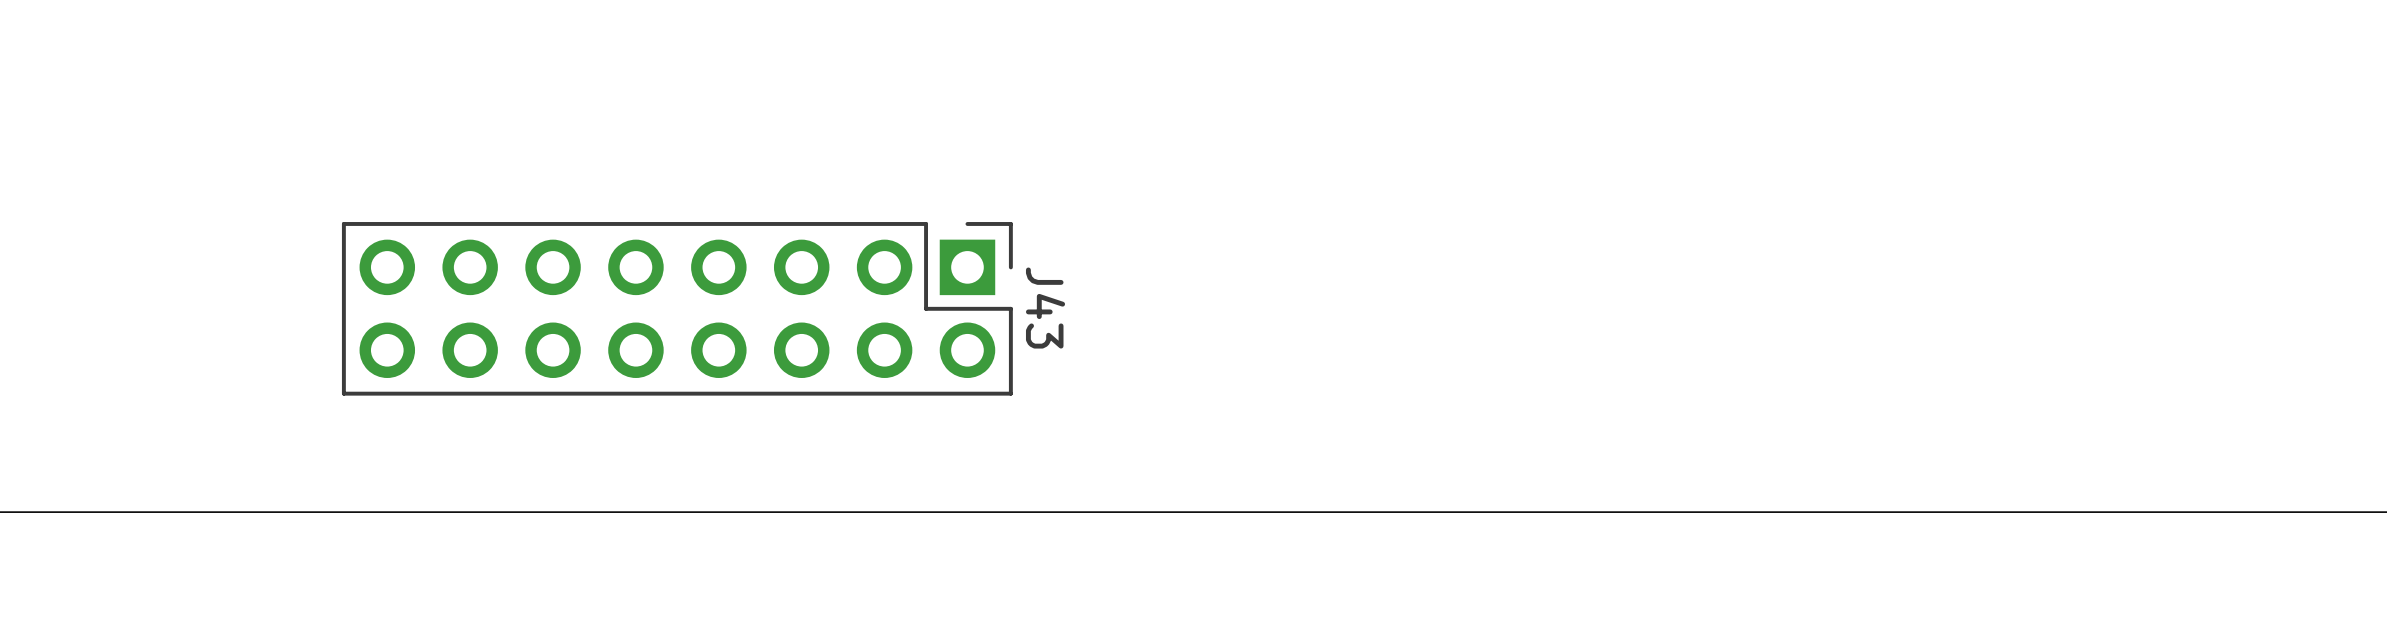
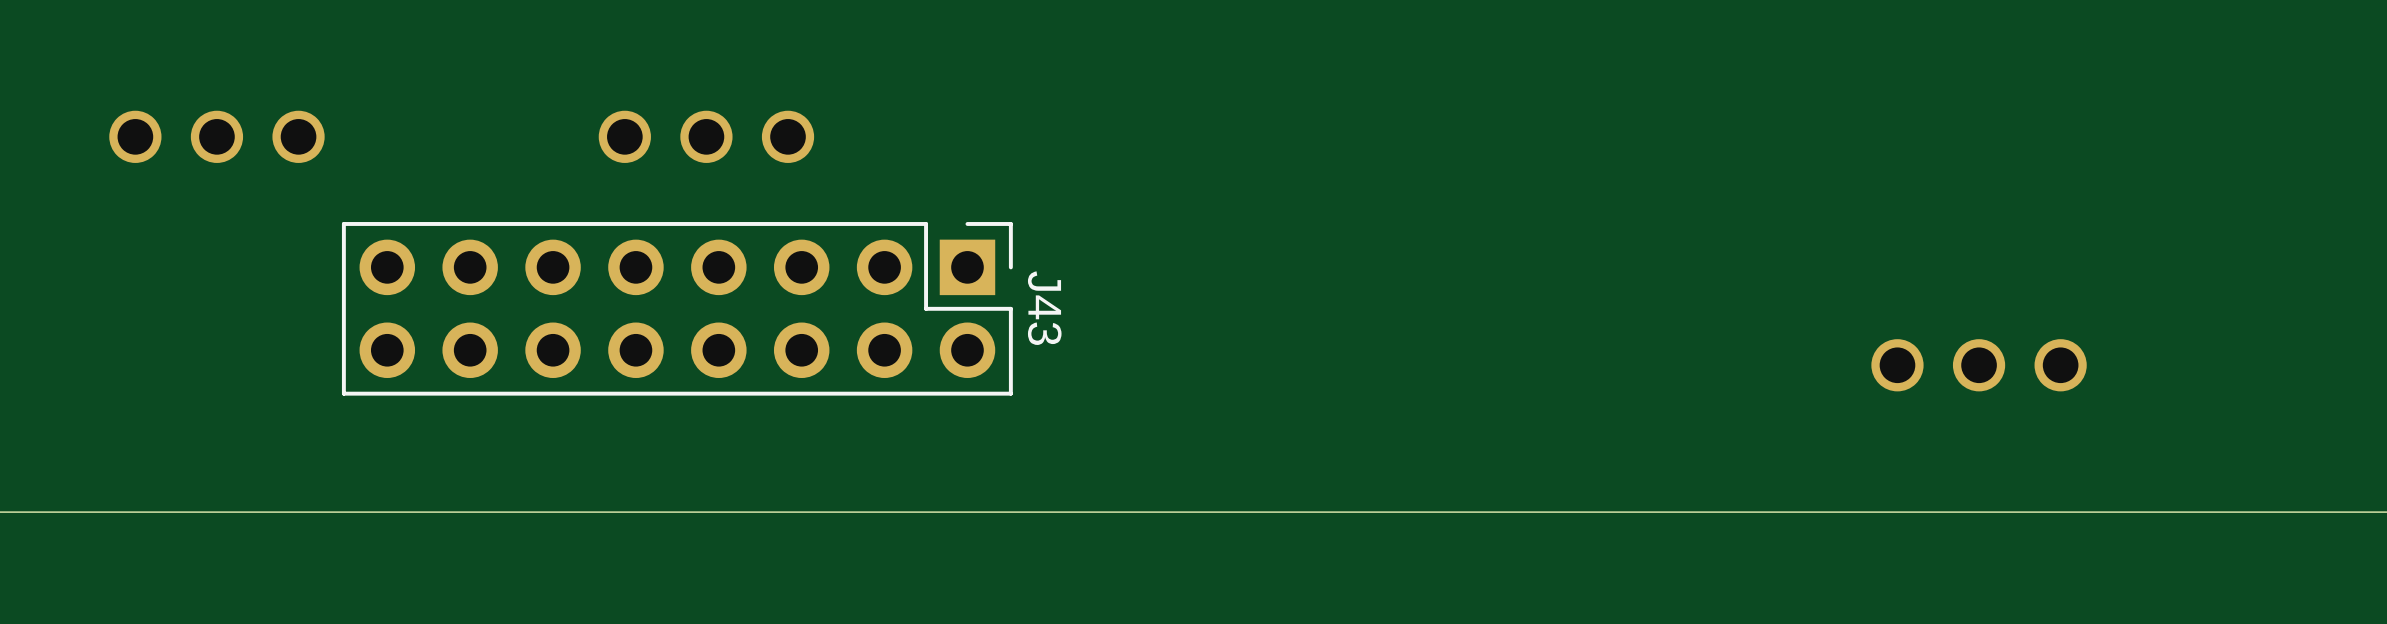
part: none -> (216, 136)
part: none -> (706, 136)
part: none -> (1979, 365)

